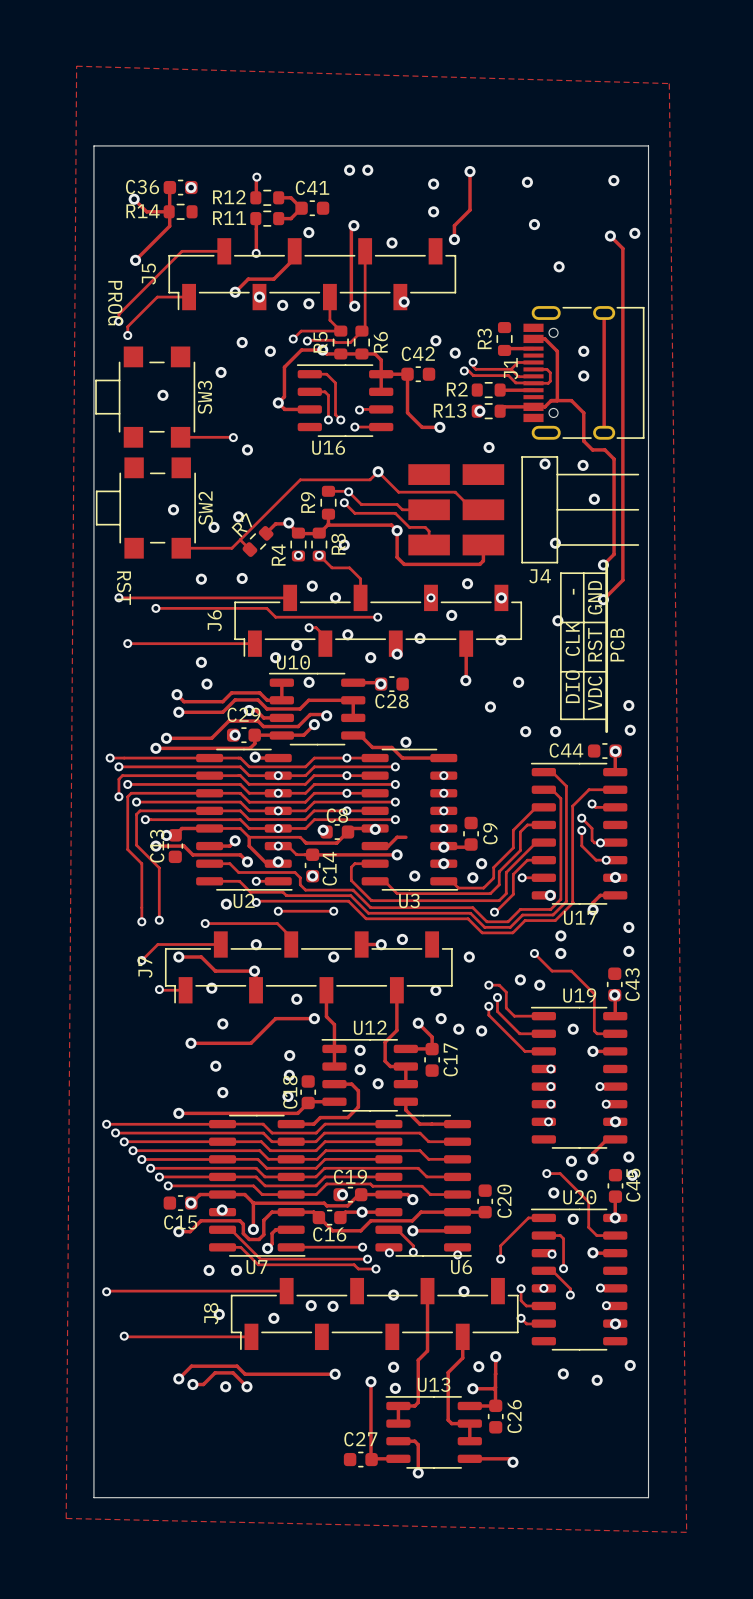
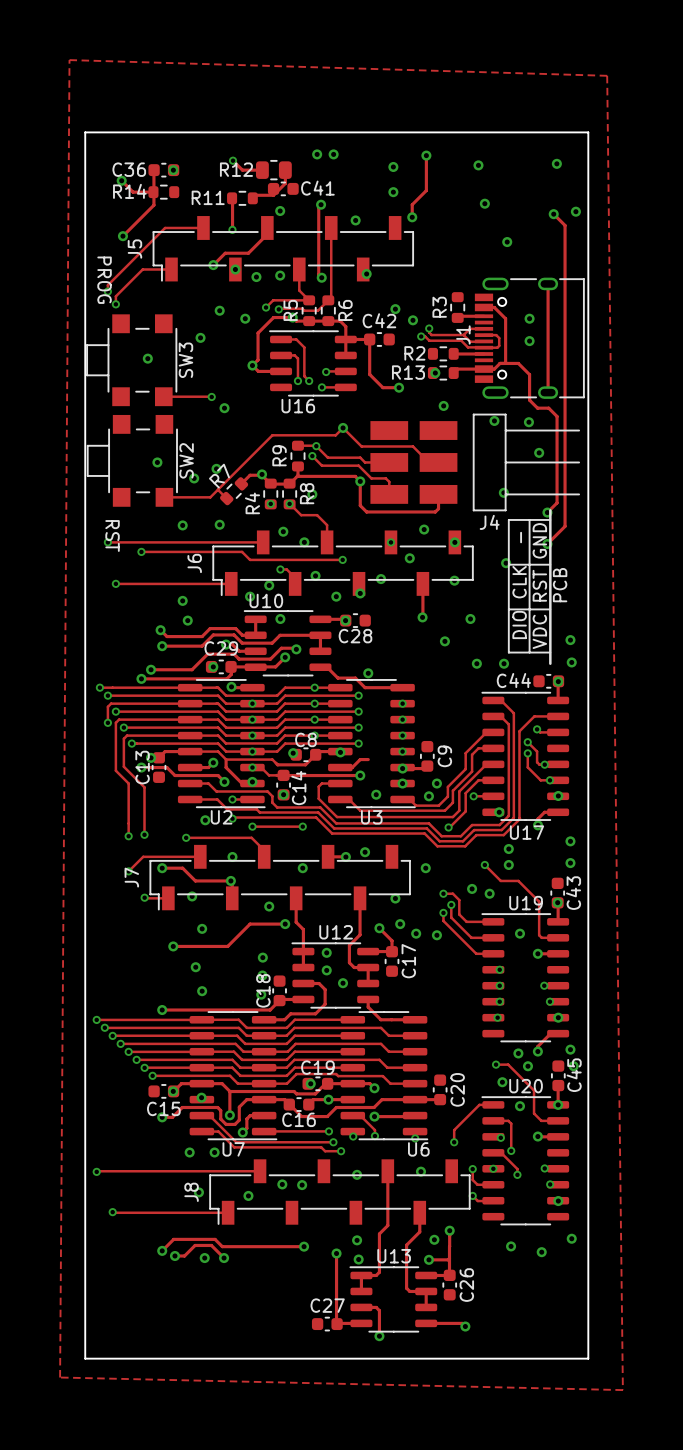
track: (256, 177) (256, 201) -> none
track: none -> (233, 160) (242, 170) (262, 170)
C41 name position: C41 (312, 187) -> C41 (317, 188)
track: none -> (285, 170) (285, 183) (273, 195) (253, 195)
R12 footprint: [250, 189, 285, 206] -> [255, 160, 292, 181]
track: (278, 197) (291, 197) (301, 208) (291, 218) (278, 218) -> none

